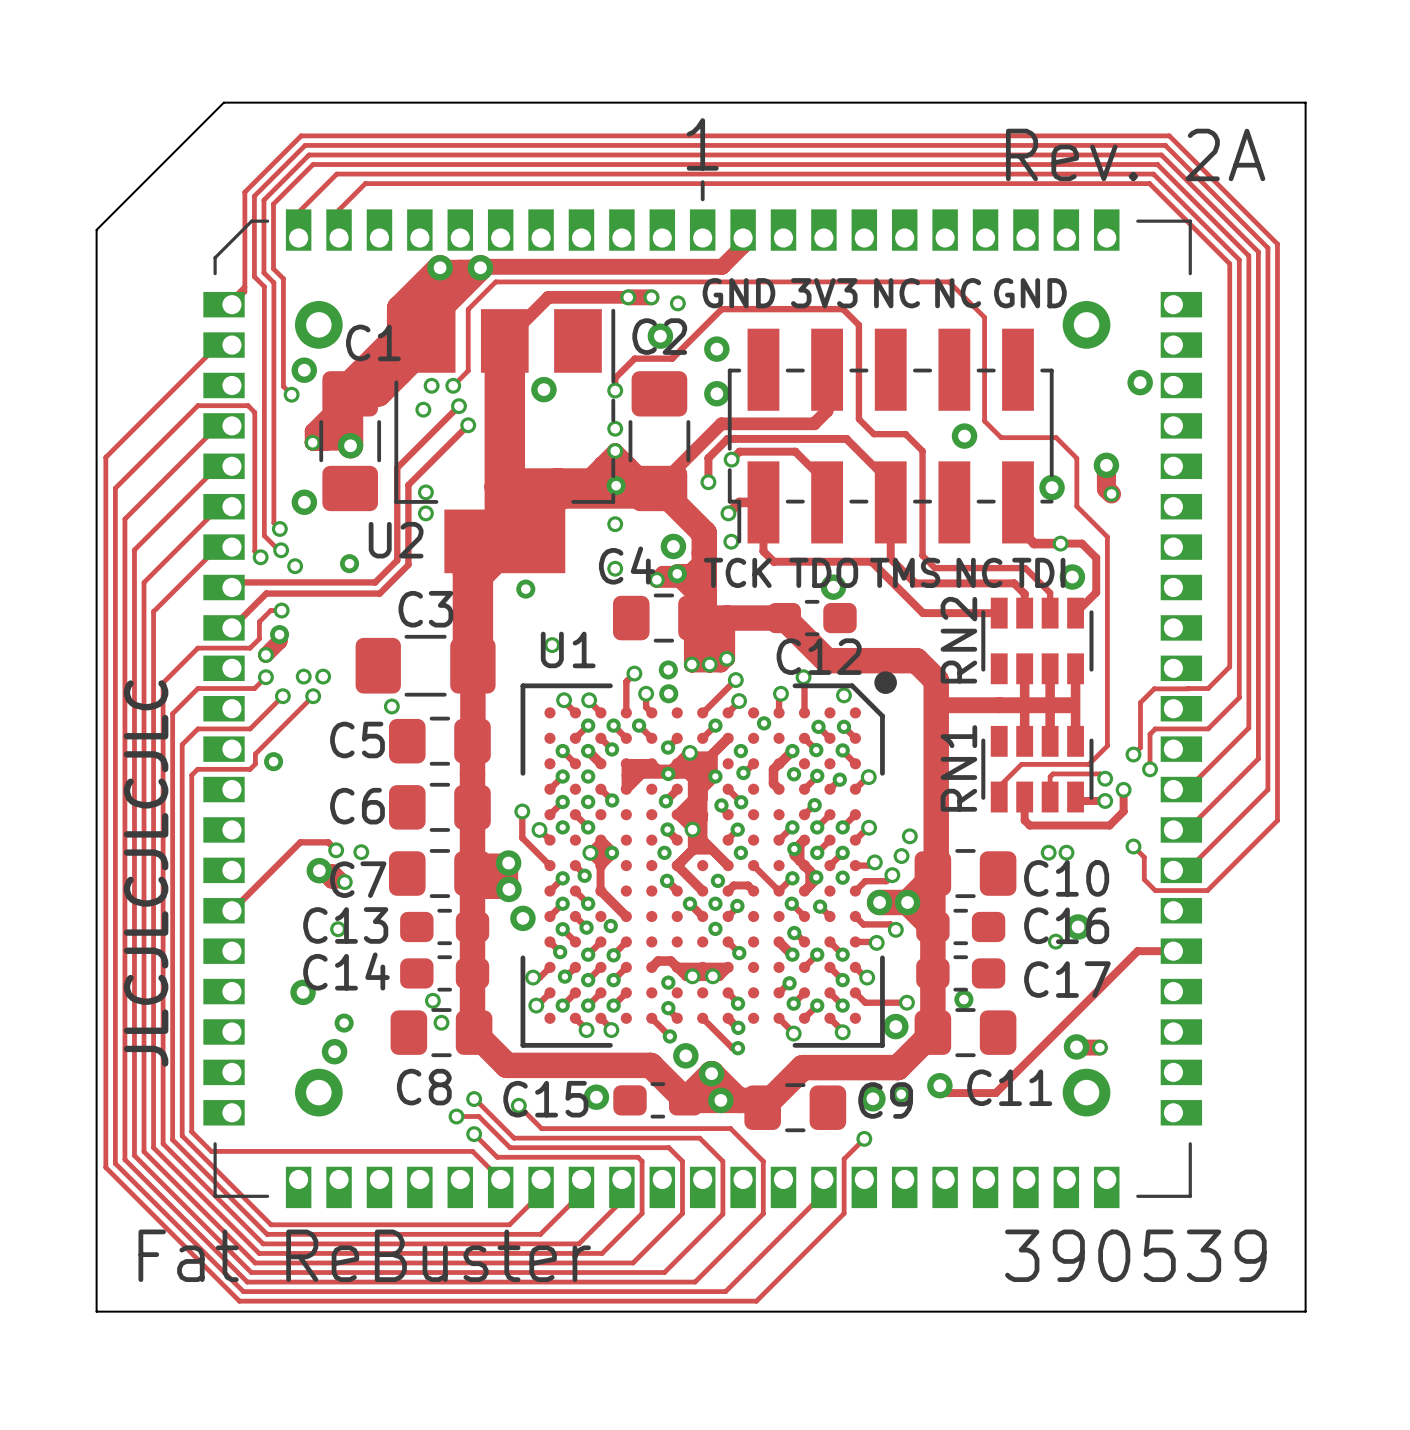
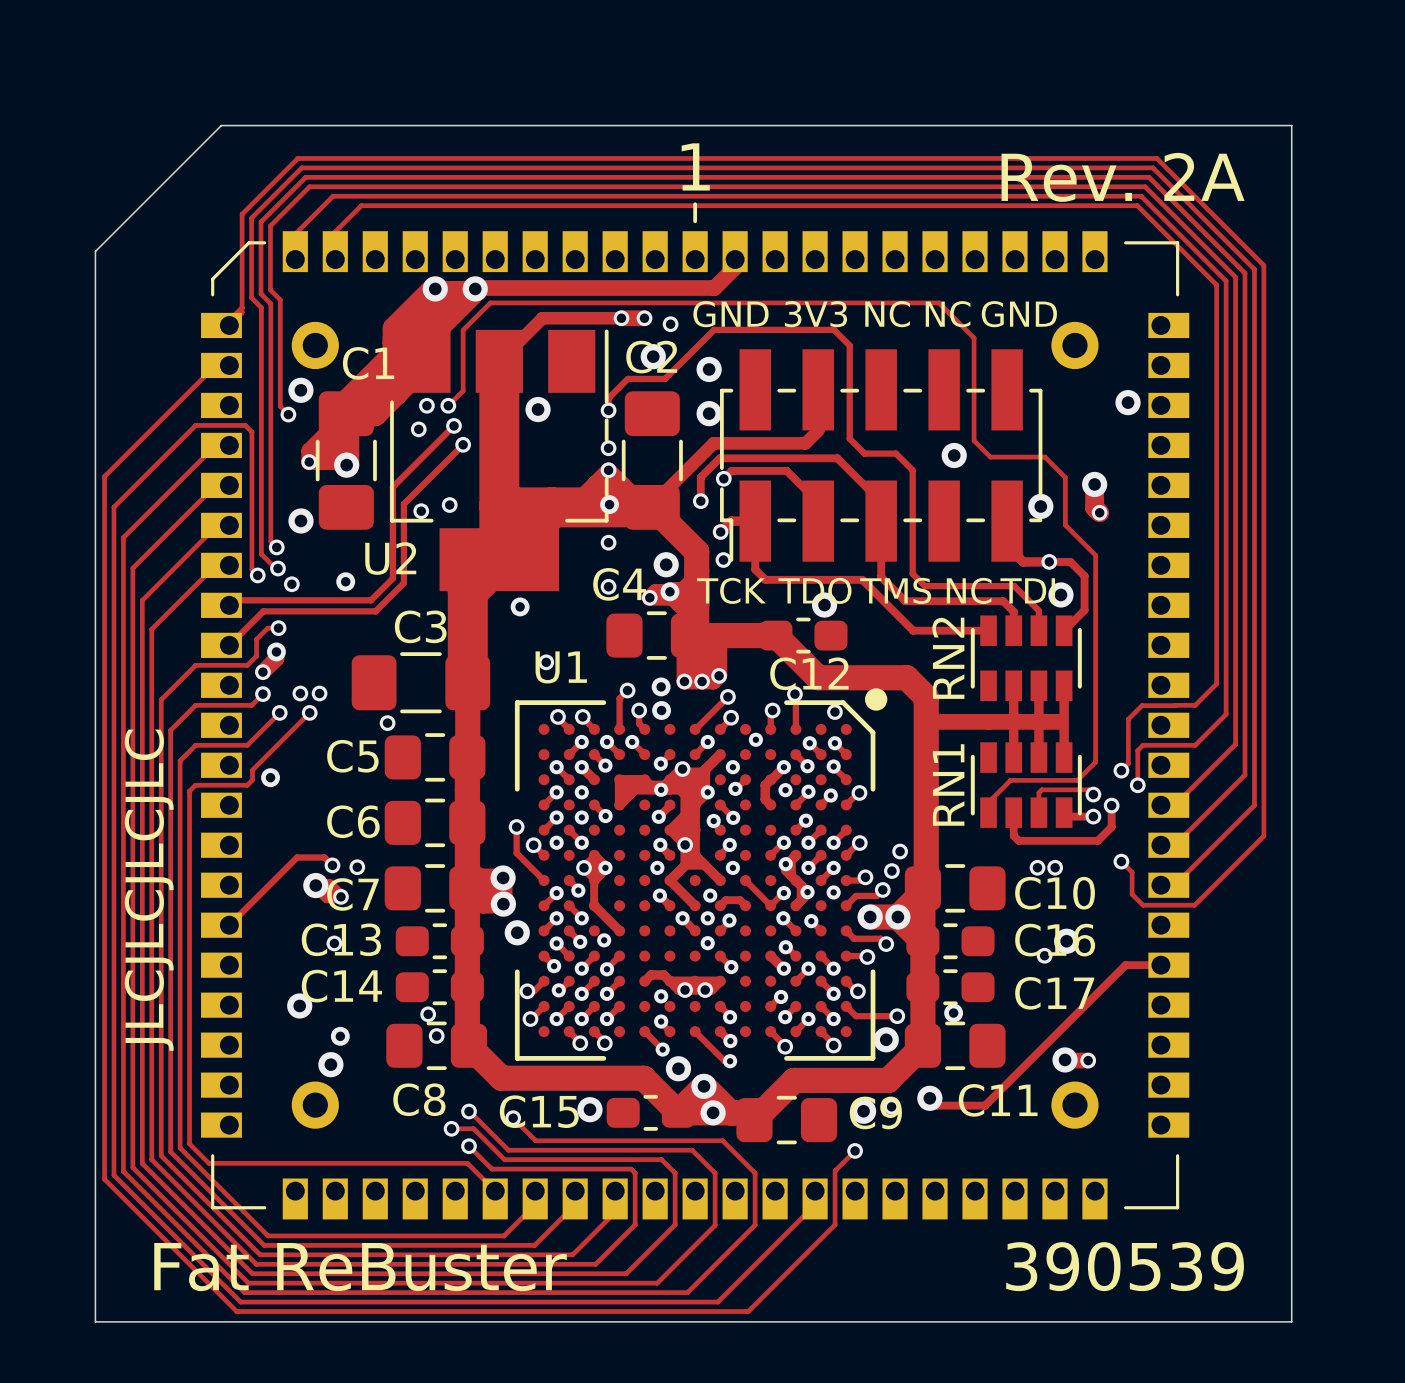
via position: (425, 513) -> (449, 505)

